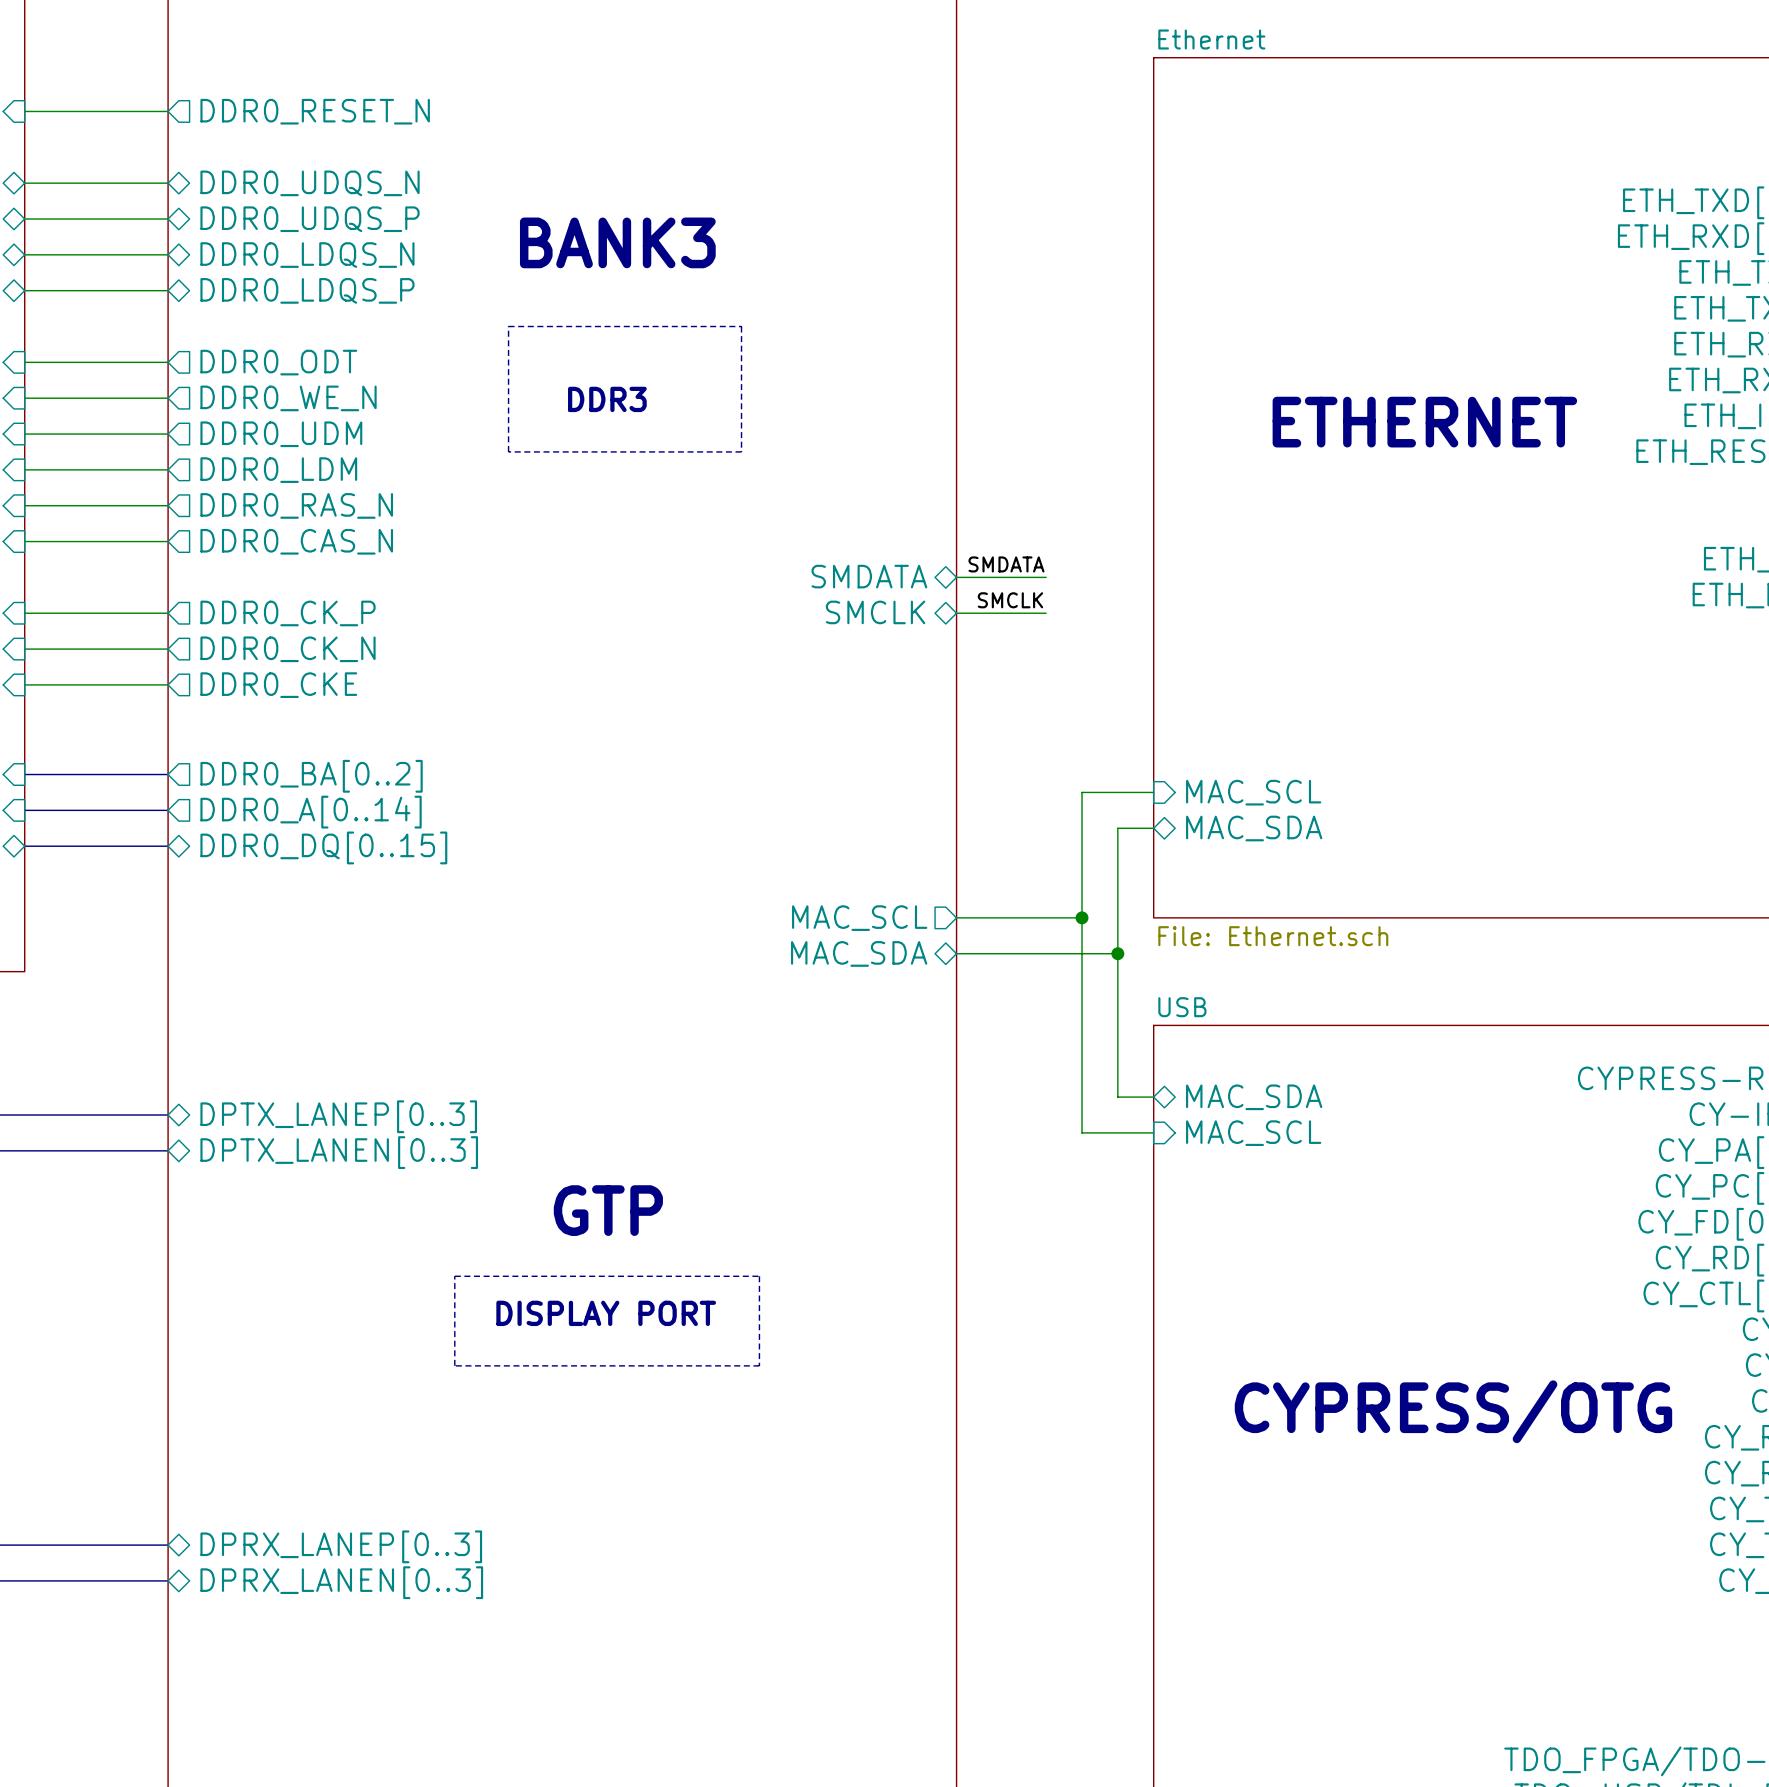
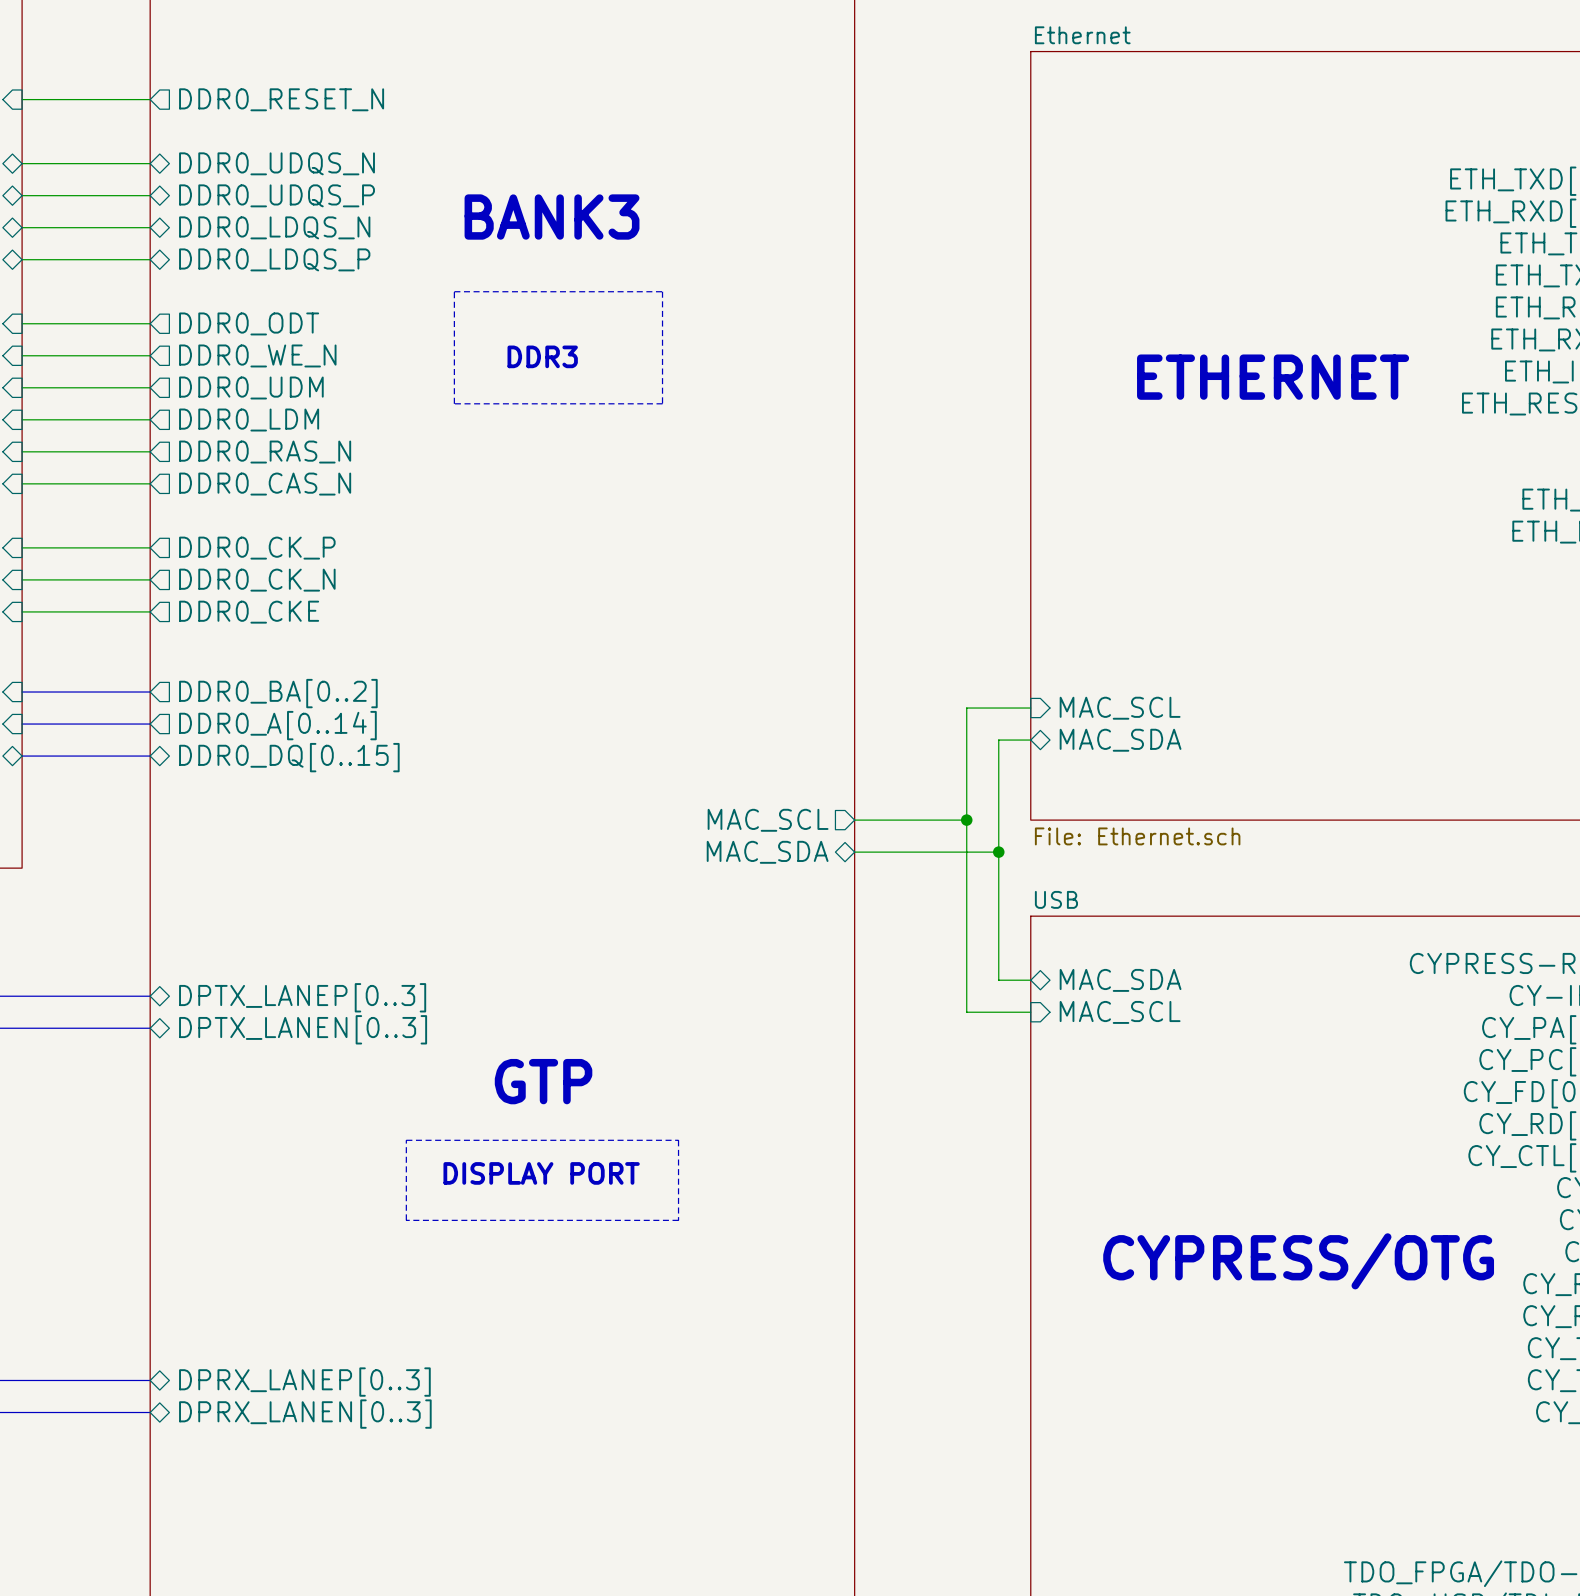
label: SMDATA (1006, 564) -> none
sheet pin: SMDATA (869, 576) -> none
wire: (956, 577) (1046, 577) -> none
label: SMCLK (1010, 600) -> none
sheet pin: SMCLK (875, 612) -> none
wire: (956, 613) (1046, 613) -> none

